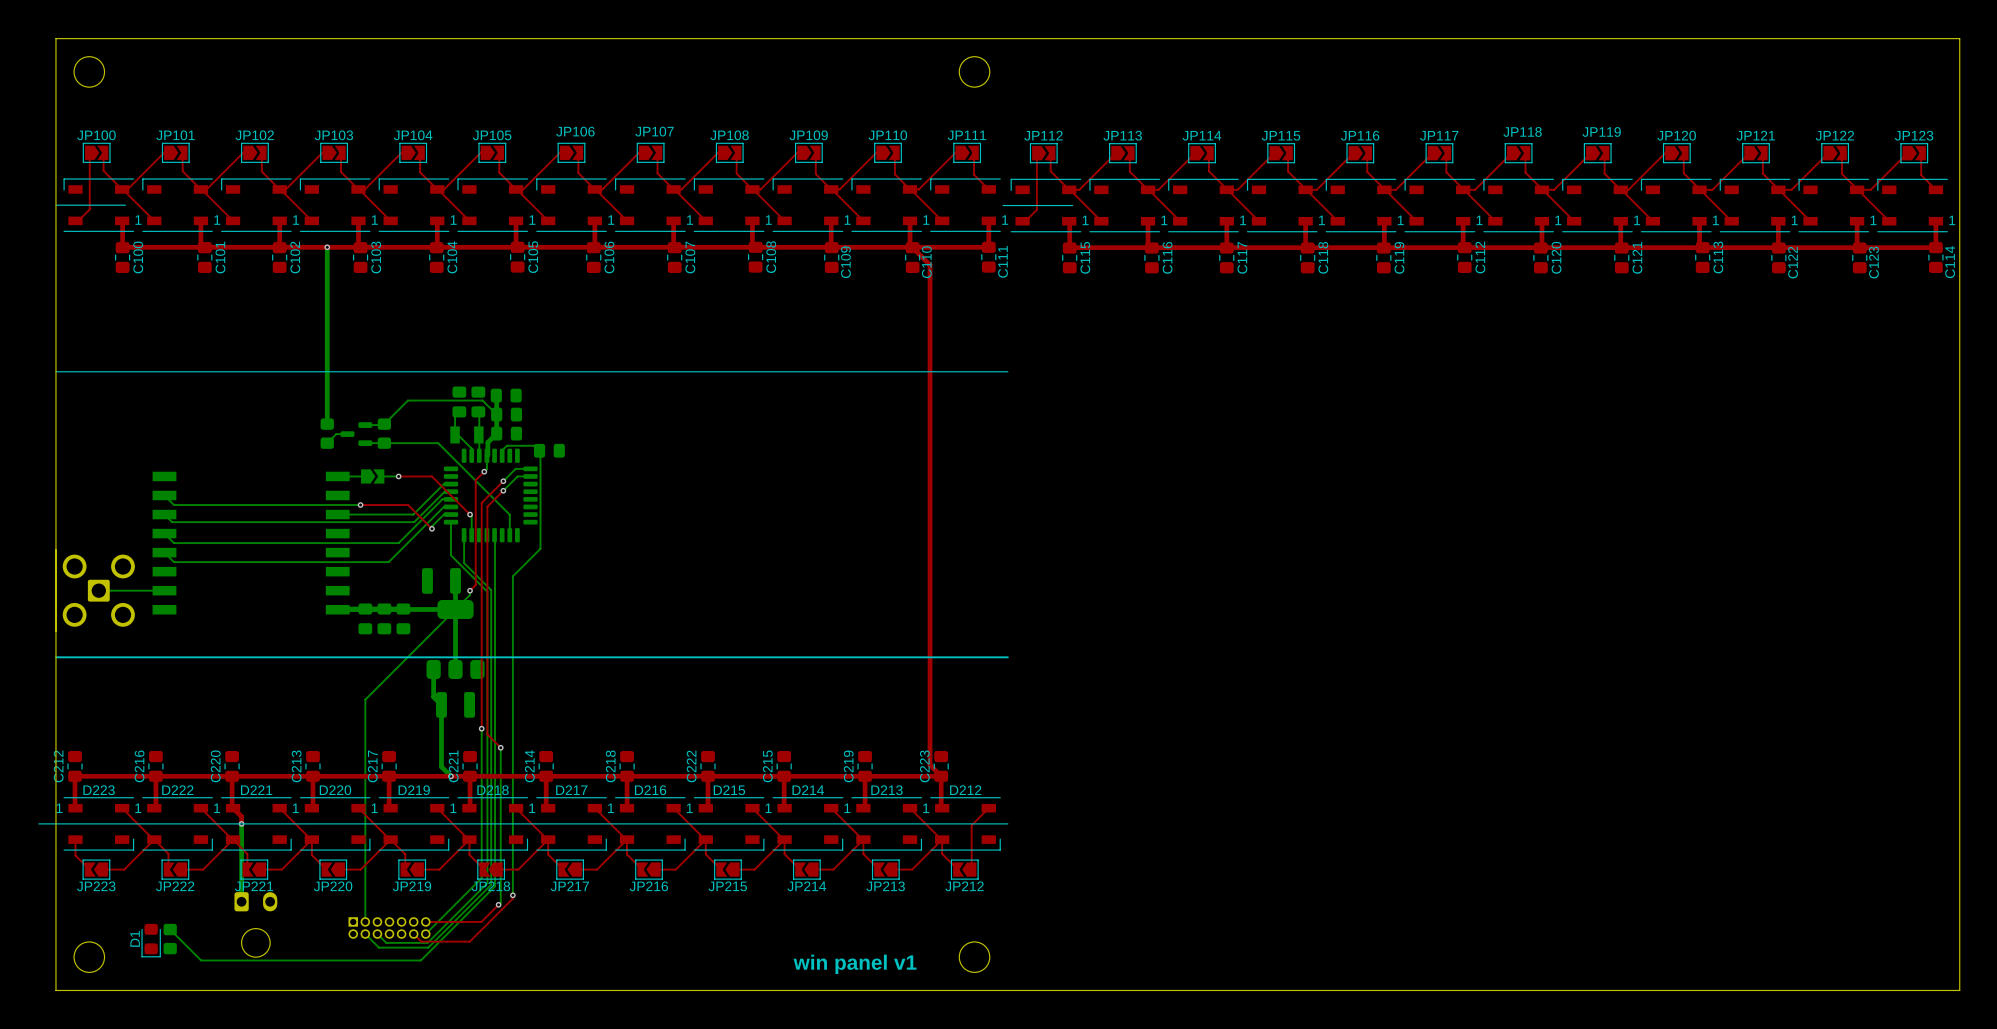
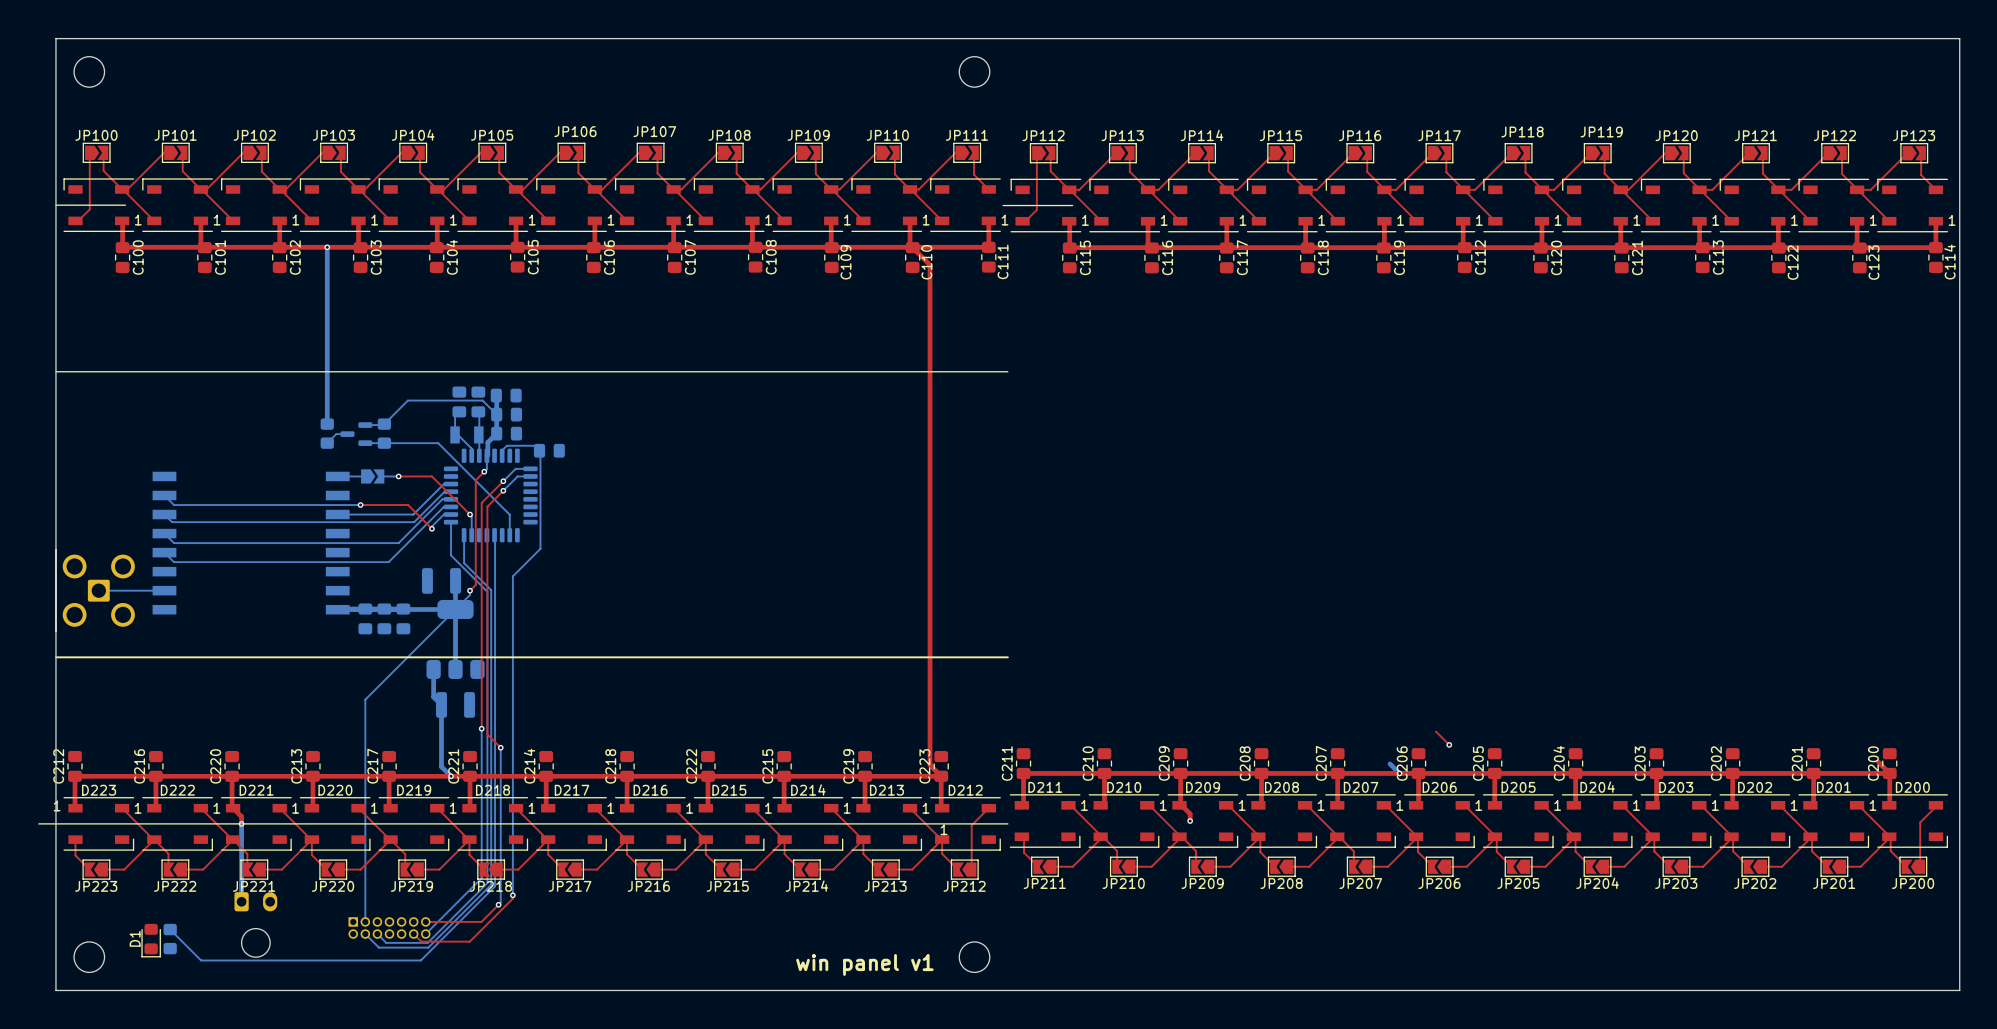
top track: none -> (1435, 731) (1449, 744)
via: none -> (1449, 744)
top track: none -> (1878, 762) (1889, 773)
C211: none -> (1023, 763)
C210: none -> (1104, 763)
C209: none -> (1180, 763)
C208: none -> (1261, 763)
C207: none -> (1337, 763)
bottom track: none -> (1390, 763) (1399, 773)
C206: none -> (1418, 763)
C205: none -> (1494, 763)
C204: none -> (1575, 763)
C203: none -> (1656, 763)
C202: none -> (1732, 763)
C201: none -> (1813, 763)
C200: none -> (1889, 763)
top track: none -> (1104, 773) (1104, 803) (1102, 805)
top track: none -> (1180, 773) (1180, 804) (1190, 813) (1190, 821)
top track: none -> (1261, 773) (1260, 805)
top track: none -> (1337, 773) (1339, 805)
via: none -> (1399, 773)
top track: none -> (1418, 773) (1417, 805)
top track: none -> (1494, 773) (1494, 803) (1496, 805)
top track: none -> (1575, 773) (1575, 805)
top track: none -> (1656, 773) (1656, 803) (1654, 805)
top track: none -> (1732, 773) (1733, 805)
top track: none -> (1813, 773) (1813, 803) (1811, 805)
top track: none -> (1889, 773) (1890, 805)
top track: none -> (1889, 773) (1023, 773) (1024, 805)
top track: none -> (1070, 805) (1102, 836)
top track: none -> (1149, 805) (1181, 836)
top track: none -> (1228, 805) (1260, 836)
top track: none -> (1307, 805) (1339, 836)
top track: none -> (1385, 805) (1417, 836)
top track: none -> (1464, 805) (1496, 836)
top track: none -> (1543, 805) (1575, 836)
top track: none -> (1622, 805) (1654, 836)
top track: none -> (1700, 805) (1733, 836)
top track: none -> (1779, 805) (1811, 836)
top track: none -> (1858, 805) (1890, 836)
top track: none -> (1937, 805) (1920, 822) (1920, 866)
D223 text position: 1 (59, 808) -> 1 (944, 829)
D211: none -> (1045, 821)
D210: none -> (1123, 821)
via: none -> (1190, 821)
D209: none -> (1202, 821)
D208: none -> (1281, 821)
D207: none -> (1360, 821)
D206: none -> (1439, 821)
D205: none -> (1518, 821)
D204: none -> (1597, 821)
D203: none -> (1676, 821)
D202: none -> (1754, 821)
D201: none -> (1833, 821)
D200: none -> (1912, 821)
top track: none -> (1024, 836) (1024, 852) (1038, 866)
top track: none -> (1102, 836) (1072, 866) (1051, 866)
top track: none -> (1102, 836) (1117, 850) (1117, 866)
top track: none -> (1181, 836) (1151, 866) (1130, 866)
top track: none -> (1181, 836) (1195, 851) (1195, 866)
top track: none -> (1260, 836) (1260, 852) (1274, 866)
top track: none -> (1260, 836) (1230, 866) (1209, 866)
top track: none -> (1339, 836) (1309, 866) (1288, 866)
top track: none -> (1339, 836) (1353, 851) (1353, 866)
top track: none -> (1417, 836) (1387, 866) (1367, 866)
top track: none -> (1417, 836) (1417, 851) (1432, 866)
top track: none -> (1496, 836) (1466, 866) (1446, 866)
top track: none -> (1496, 836) (1496, 851) (1511, 866)
top track: none -> (1575, 836) (1545, 866) (1525, 866)
top track: none -> (1575, 836) (1575, 851) (1590, 866)
top track: none -> (1654, 836) (1624, 866) (1604, 866)
top track: none -> (1654, 836) (1654, 851) (1669, 866)
top track: none -> (1733, 836) (1733, 851) (1748, 866)
top track: none -> (1733, 836) (1703, 866) (1683, 866)
top track: none -> (1811, 836) (1811, 851) (1827, 866)
top track: none -> (1811, 836) (1781, 866) (1762, 866)
top track: none -> (1890, 836) (1860, 866) (1841, 866)
top track: none -> (1890, 836) (1890, 851) (1906, 866)
JP211: none -> (1044, 866)
JP210: none -> (1123, 866)
JP209: none -> (1202, 866)
JP208: none -> (1281, 866)
JP207: none -> (1360, 866)
JP206: none -> (1439, 866)
JP205: none -> (1518, 866)
JP204: none -> (1597, 866)
JP203: none -> (1676, 866)
JP202: none -> (1755, 866)
JP201: none -> (1834, 866)
JP200: none -> (1913, 866)

